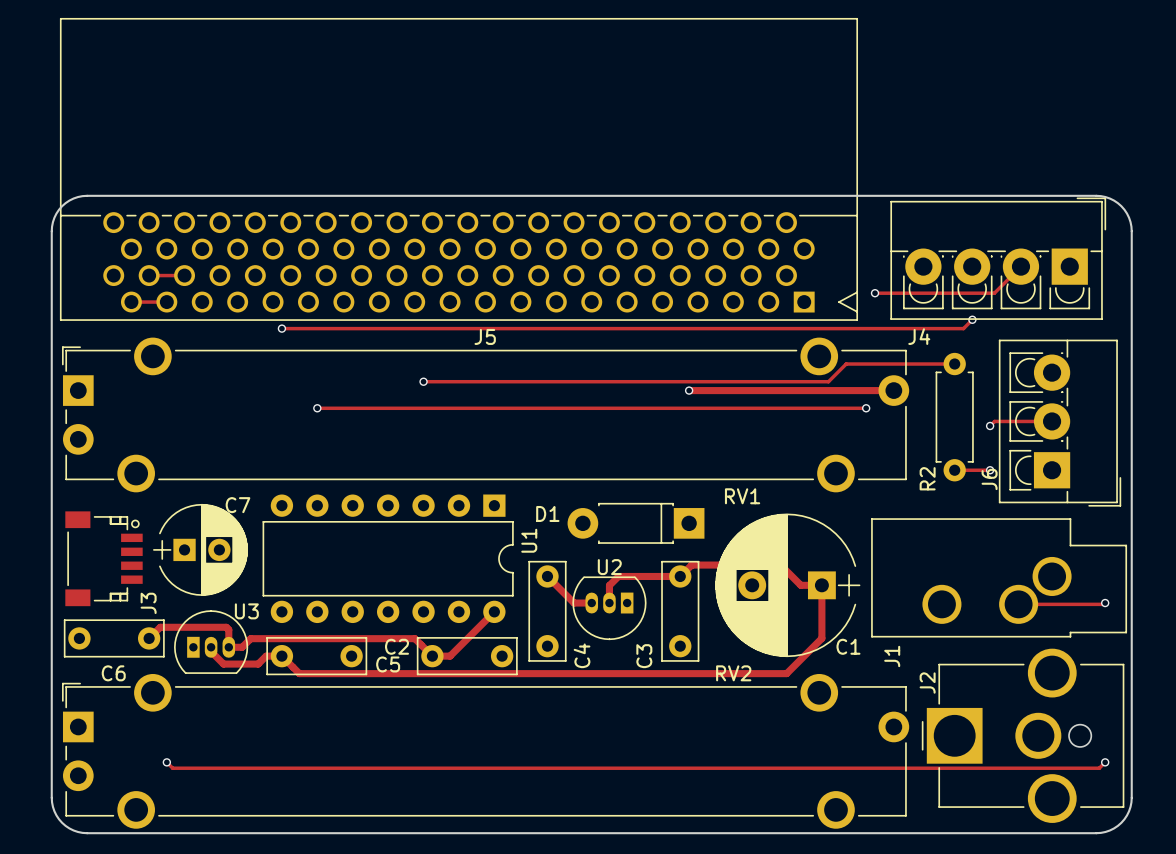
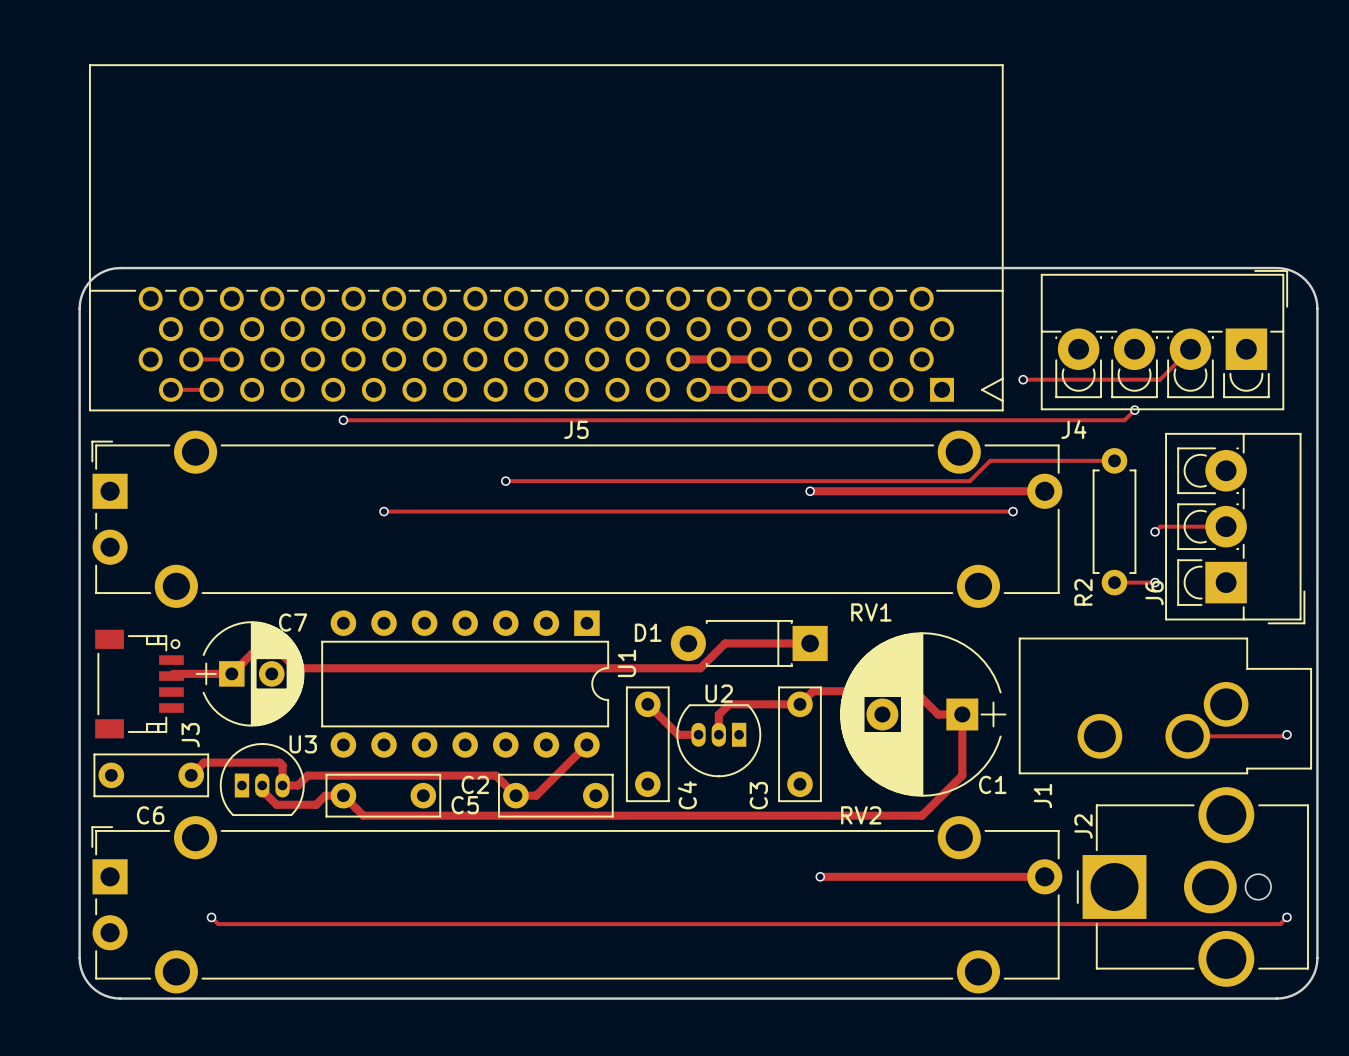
track: none -> (678, 359) (759, 359)
track: none -> (698, 389) (779, 389)
track: none -> (810, 643) (725, 643) (700, 668) (295, 668) (281, 653) (251, 653) (231, 673) (173, 673) (171, 676)
track: none -> (820, 876) (1044, 876)
via: none -> (820, 876)

